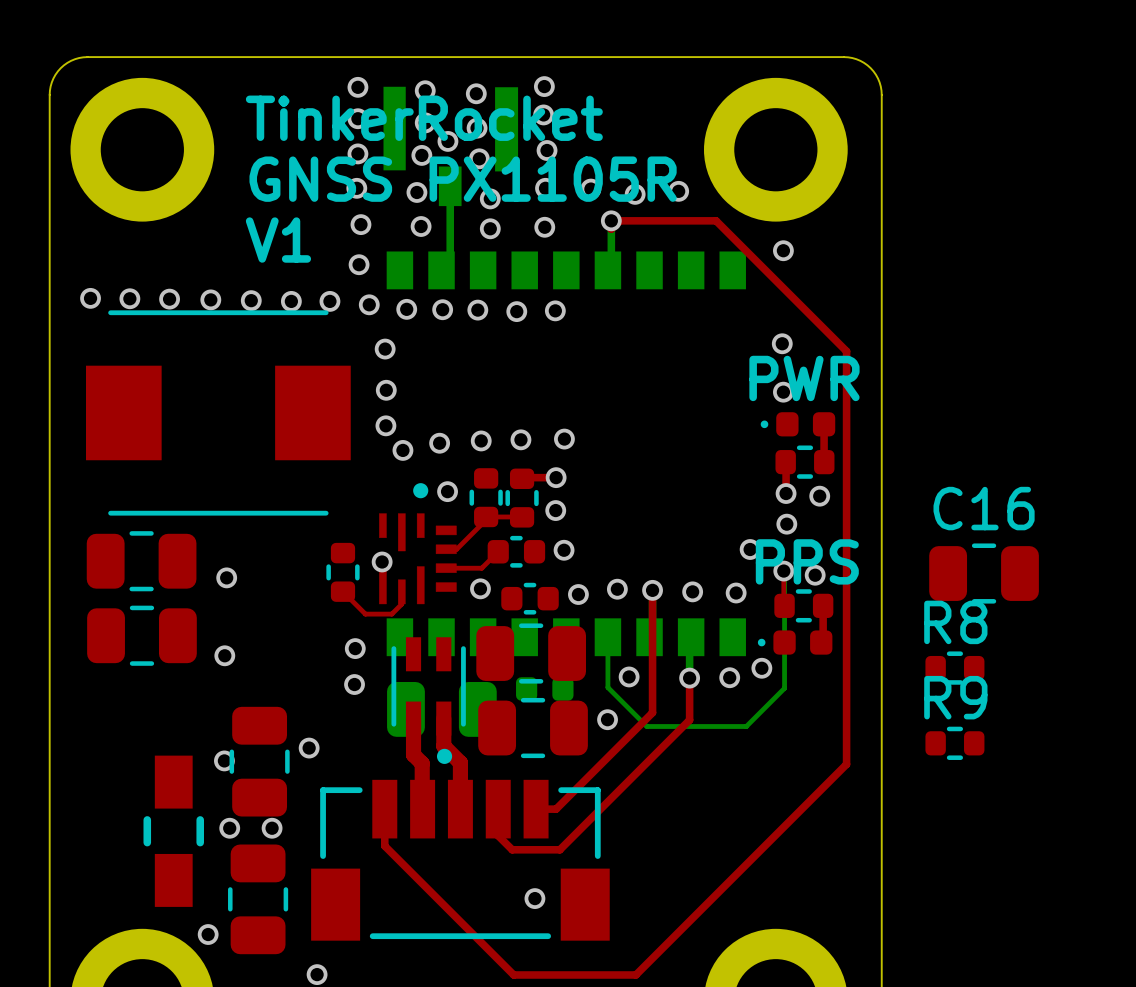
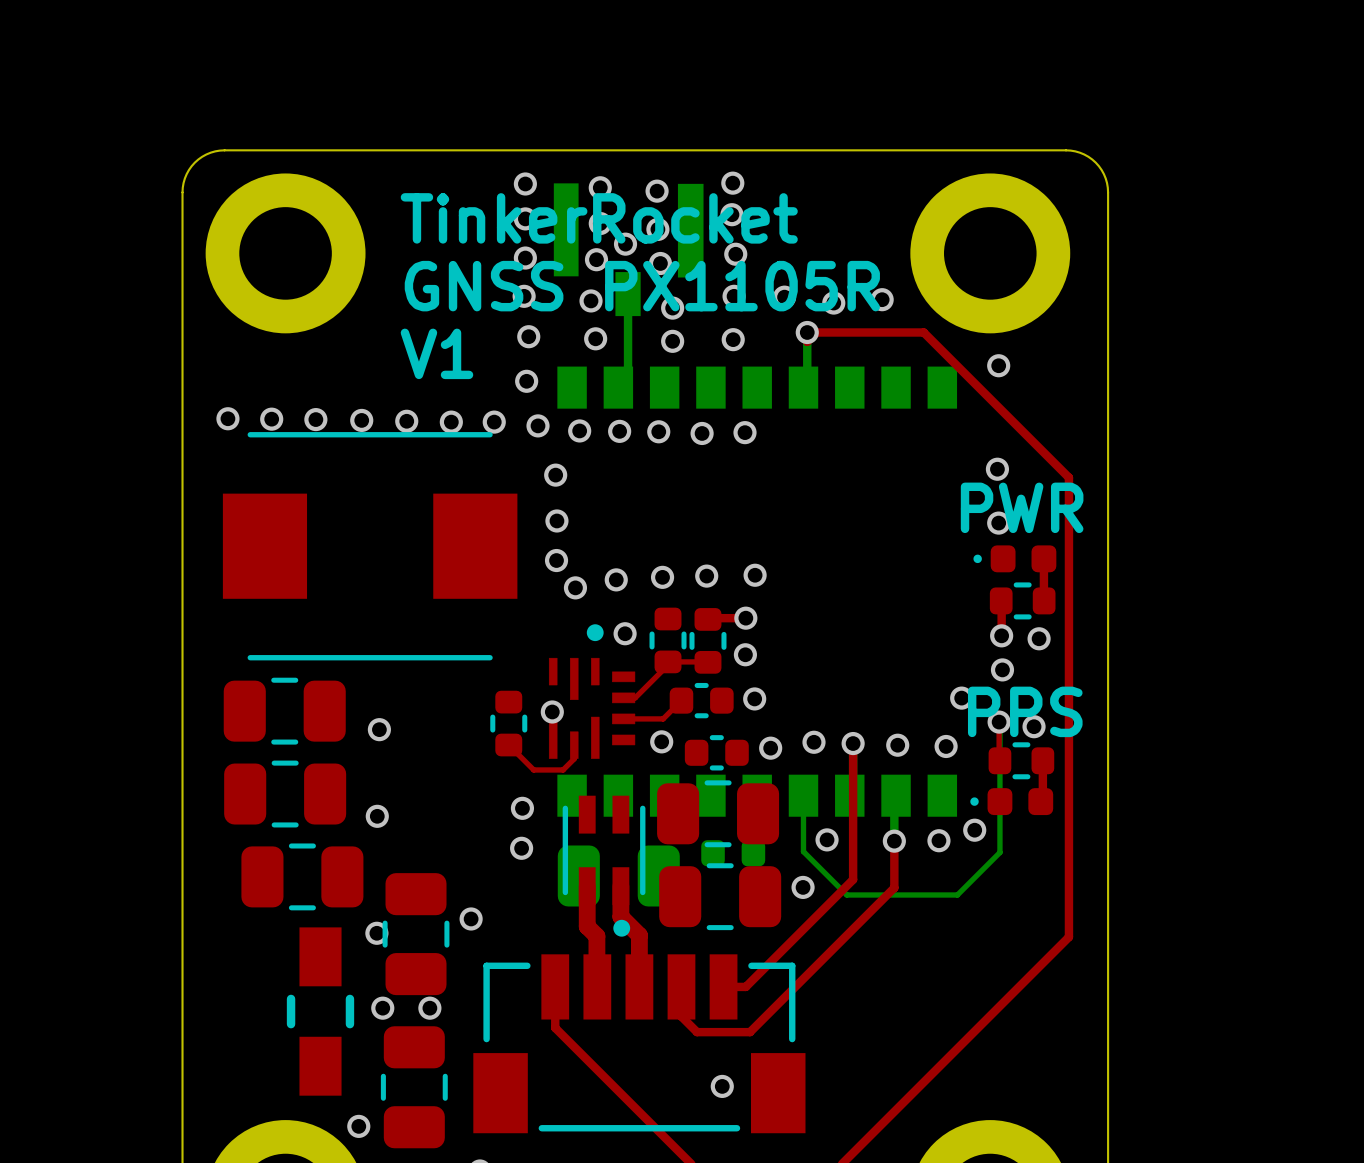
C16: (984, 573) -> none
R8: (954, 668) -> none
part: none -> (302, 876)
R9: (954, 743) -> none

